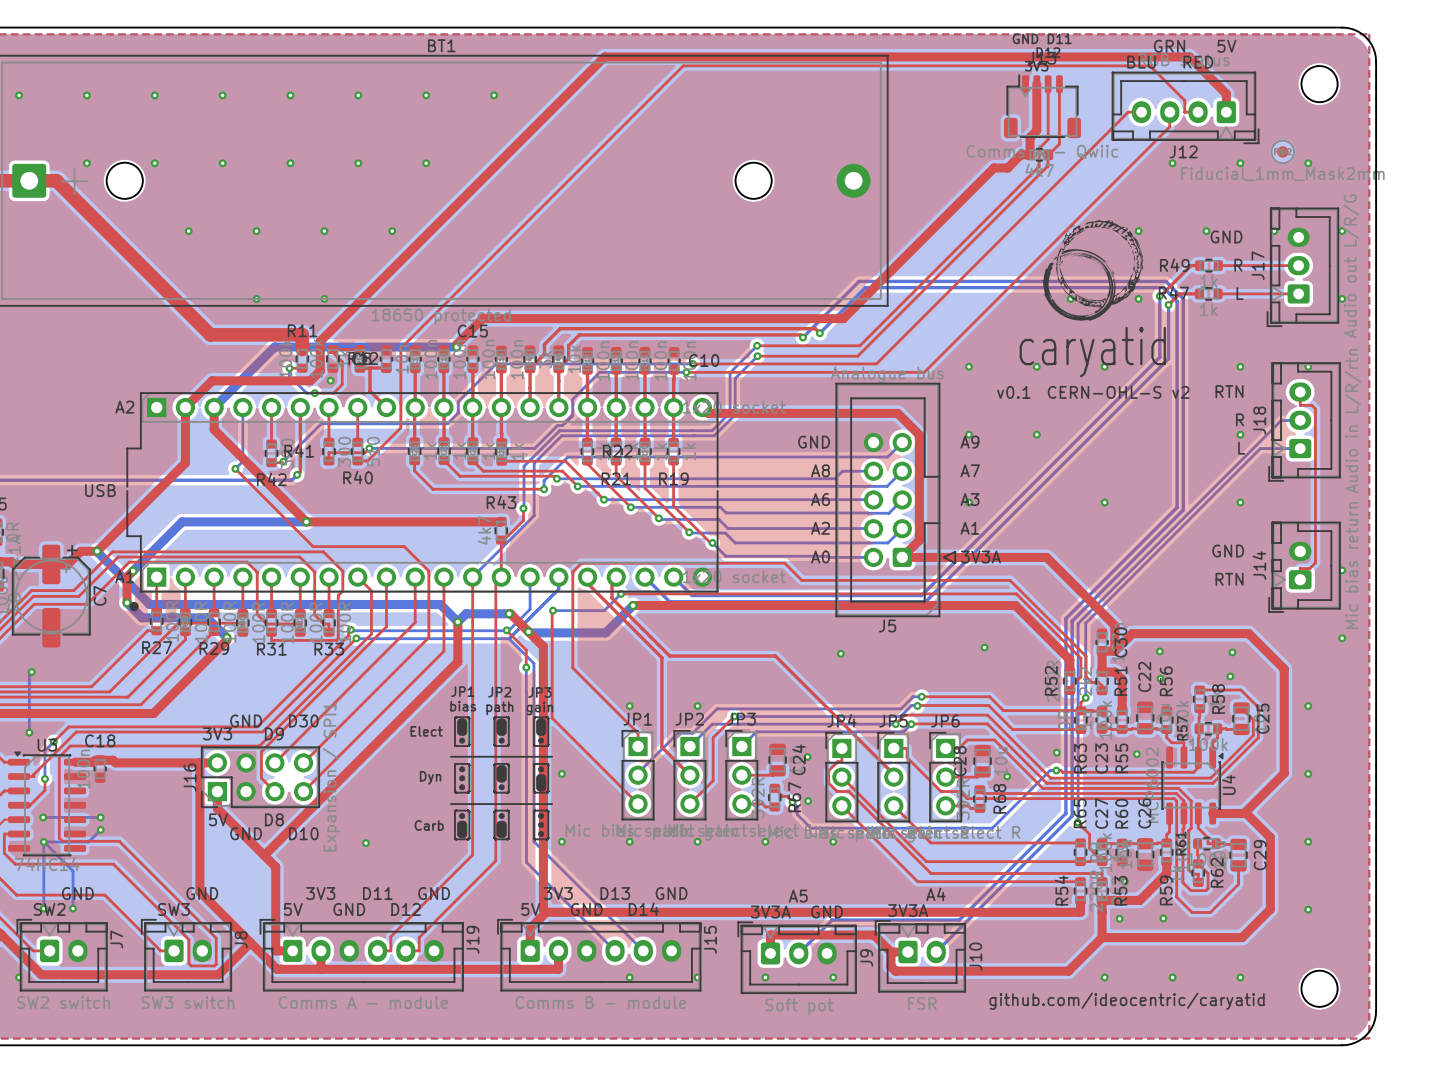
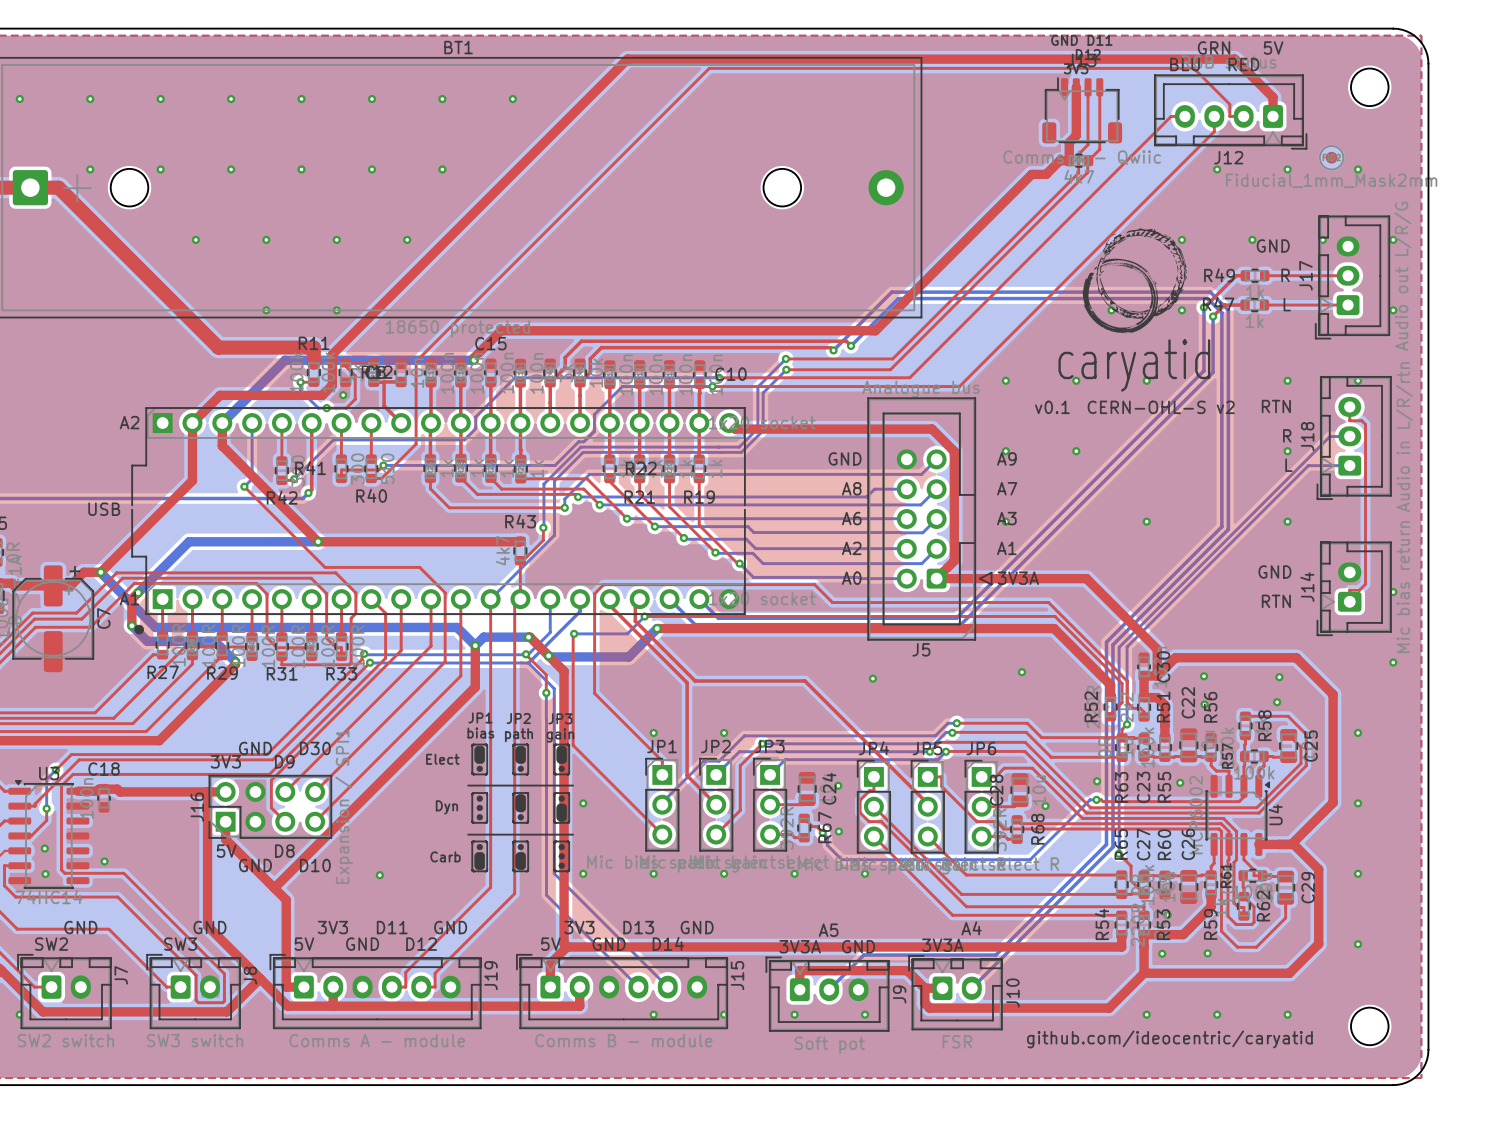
bottom track: (31, 672) (29, 674) (29, 732) -> none
via: (31, 672) -> none
via: (29, 732) -> none
bottom track: (43, 817) (100, 817) -> none
via: (100, 817) -> none
bottom track: (100, 829) (88, 842) (43, 842) (43, 908) -> none
bottom track: (43, 842) (73, 871) (73, 908) -> none
via: (43, 908) -> none
via: (73, 908) -> none

